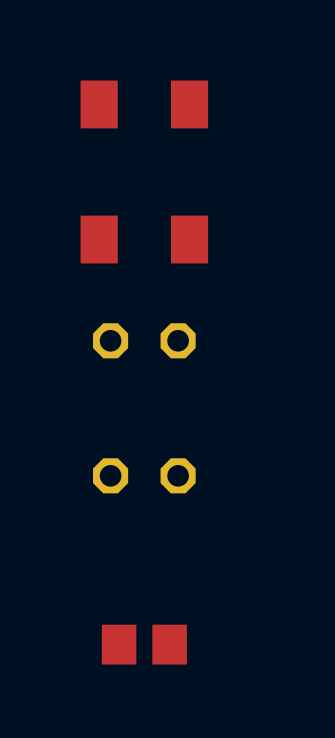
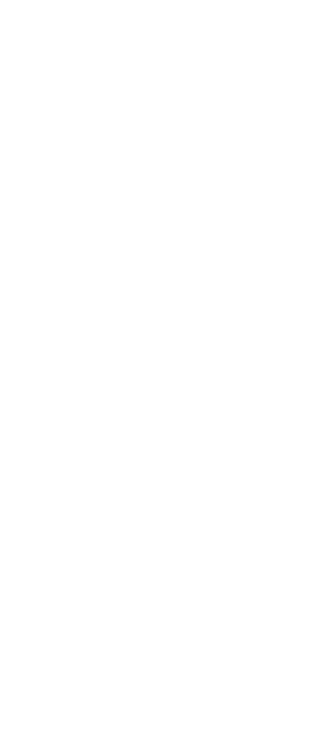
part: (144, 104) -> none
part: (144, 239) -> none
part: (144, 340) -> none
part: (144, 475) -> none
part: (144, 644) -> none

